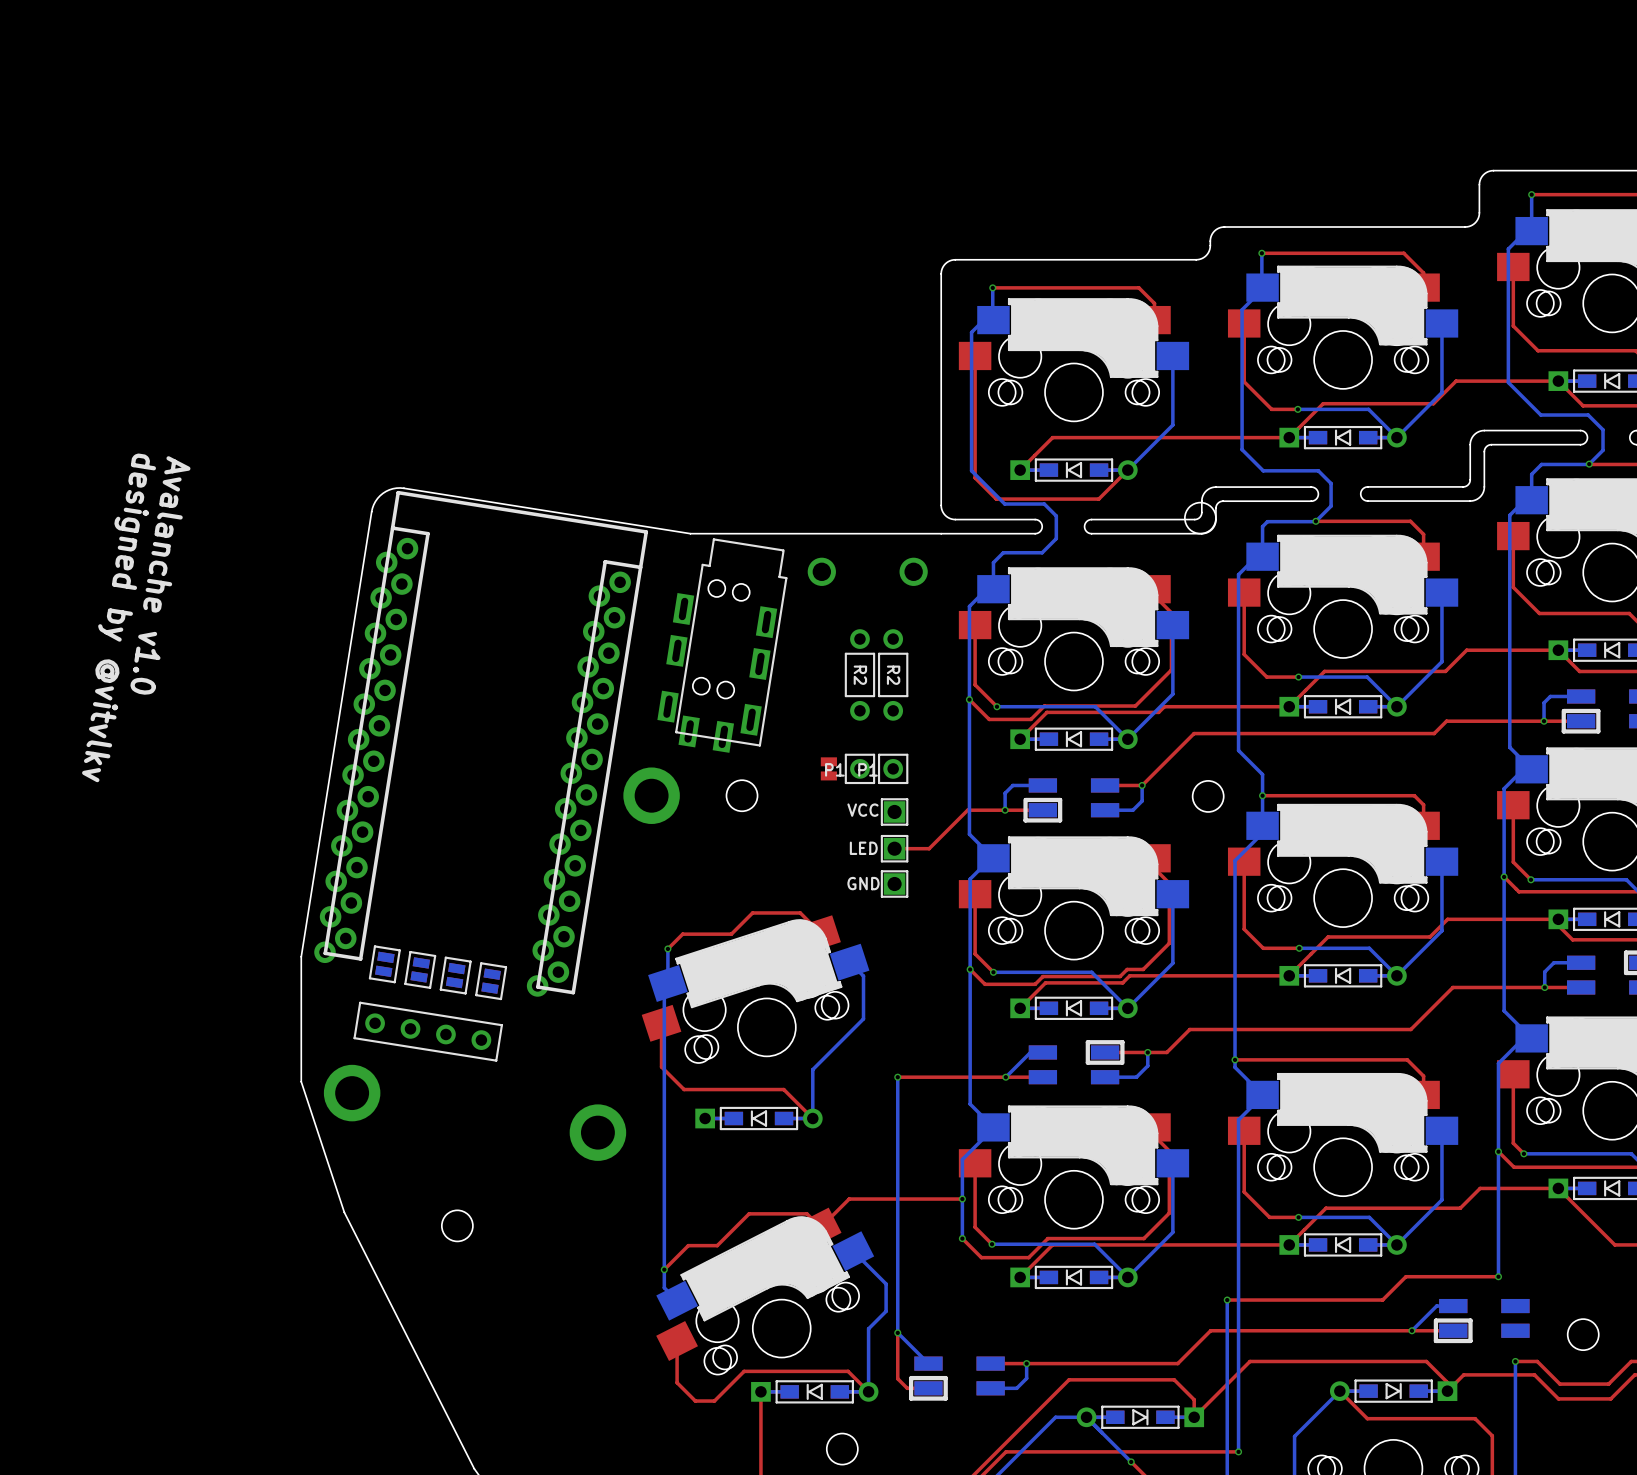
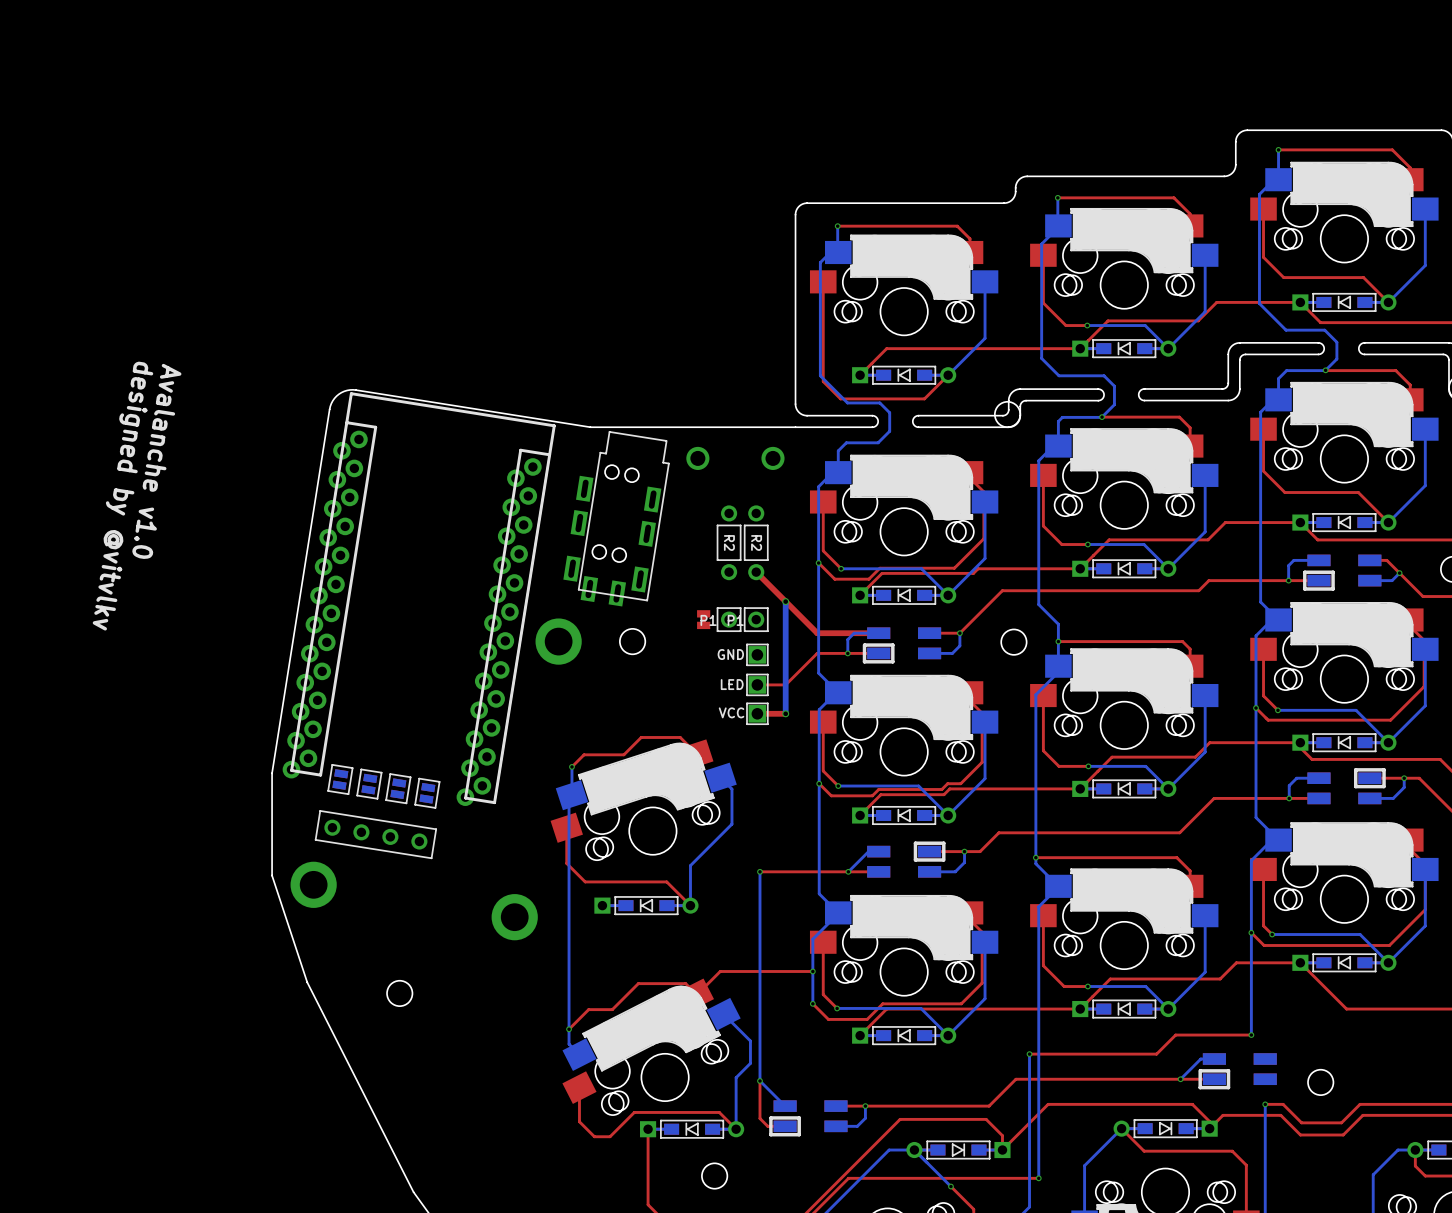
top track: none -> (756, 572) (817, 633) (878, 633)
bottom track: none -> (785, 601) (785, 713)
via: none -> (785, 601)
part text position: VCC (862, 810) -> VCC (731, 712)
part text position: GND (863, 883) -> GND (730, 654)
top track: none -> (785, 713) (757, 713)
via: none -> (785, 713)

